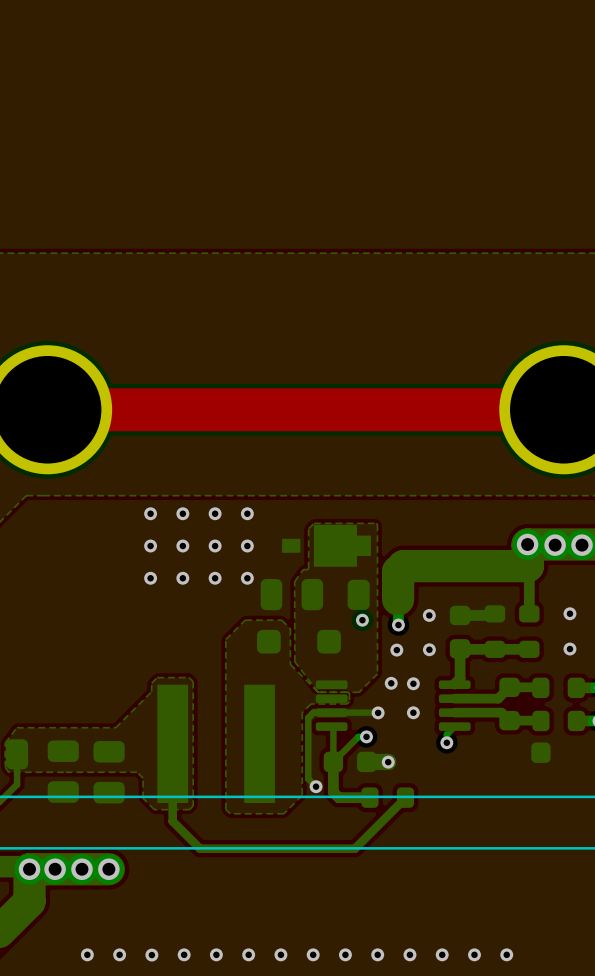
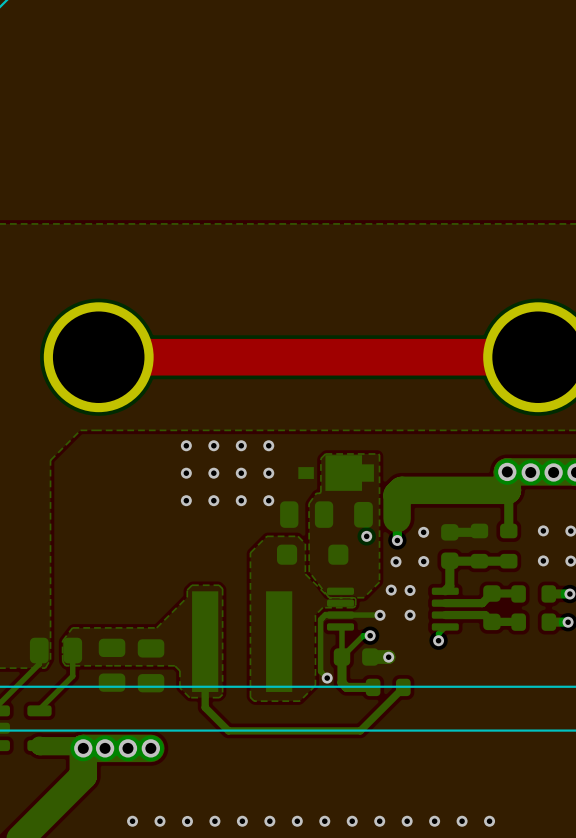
part: (540, 752) -> none

